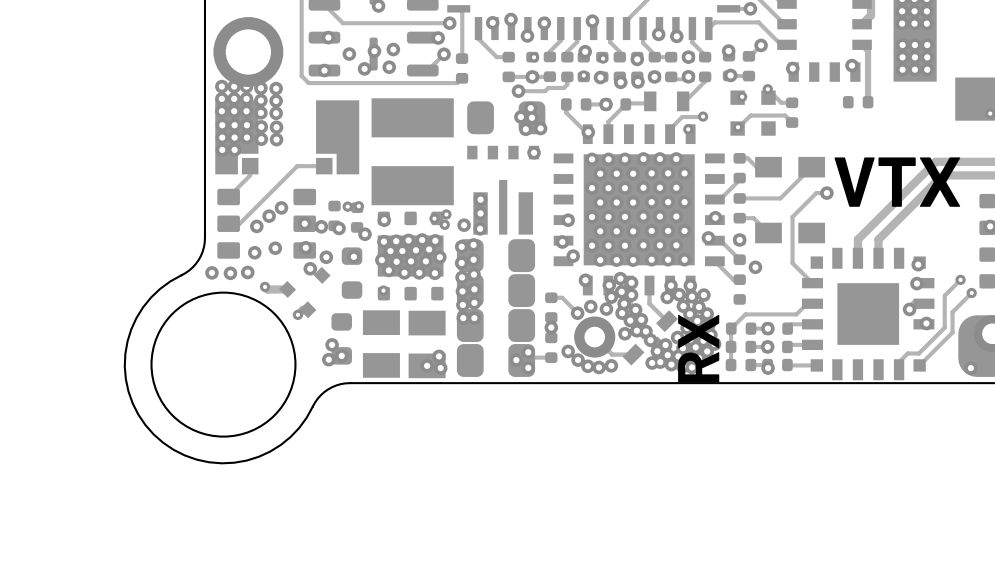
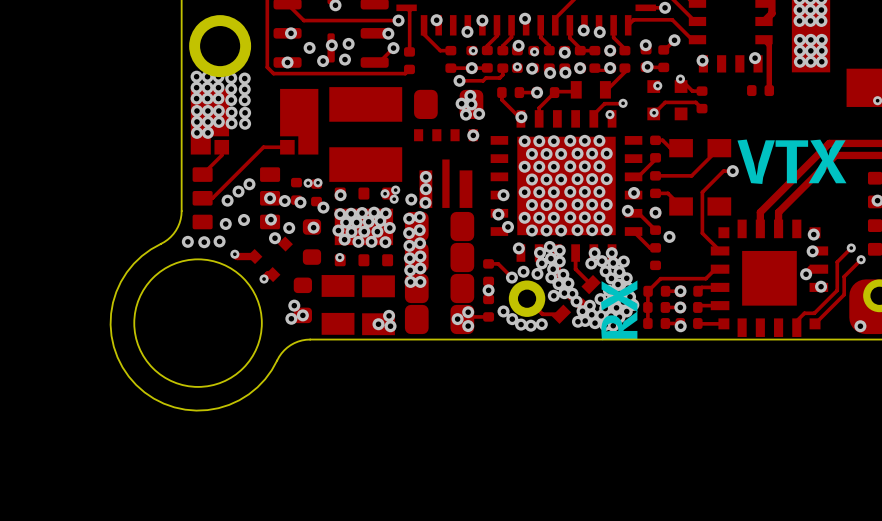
via: (511, 19) -> none

